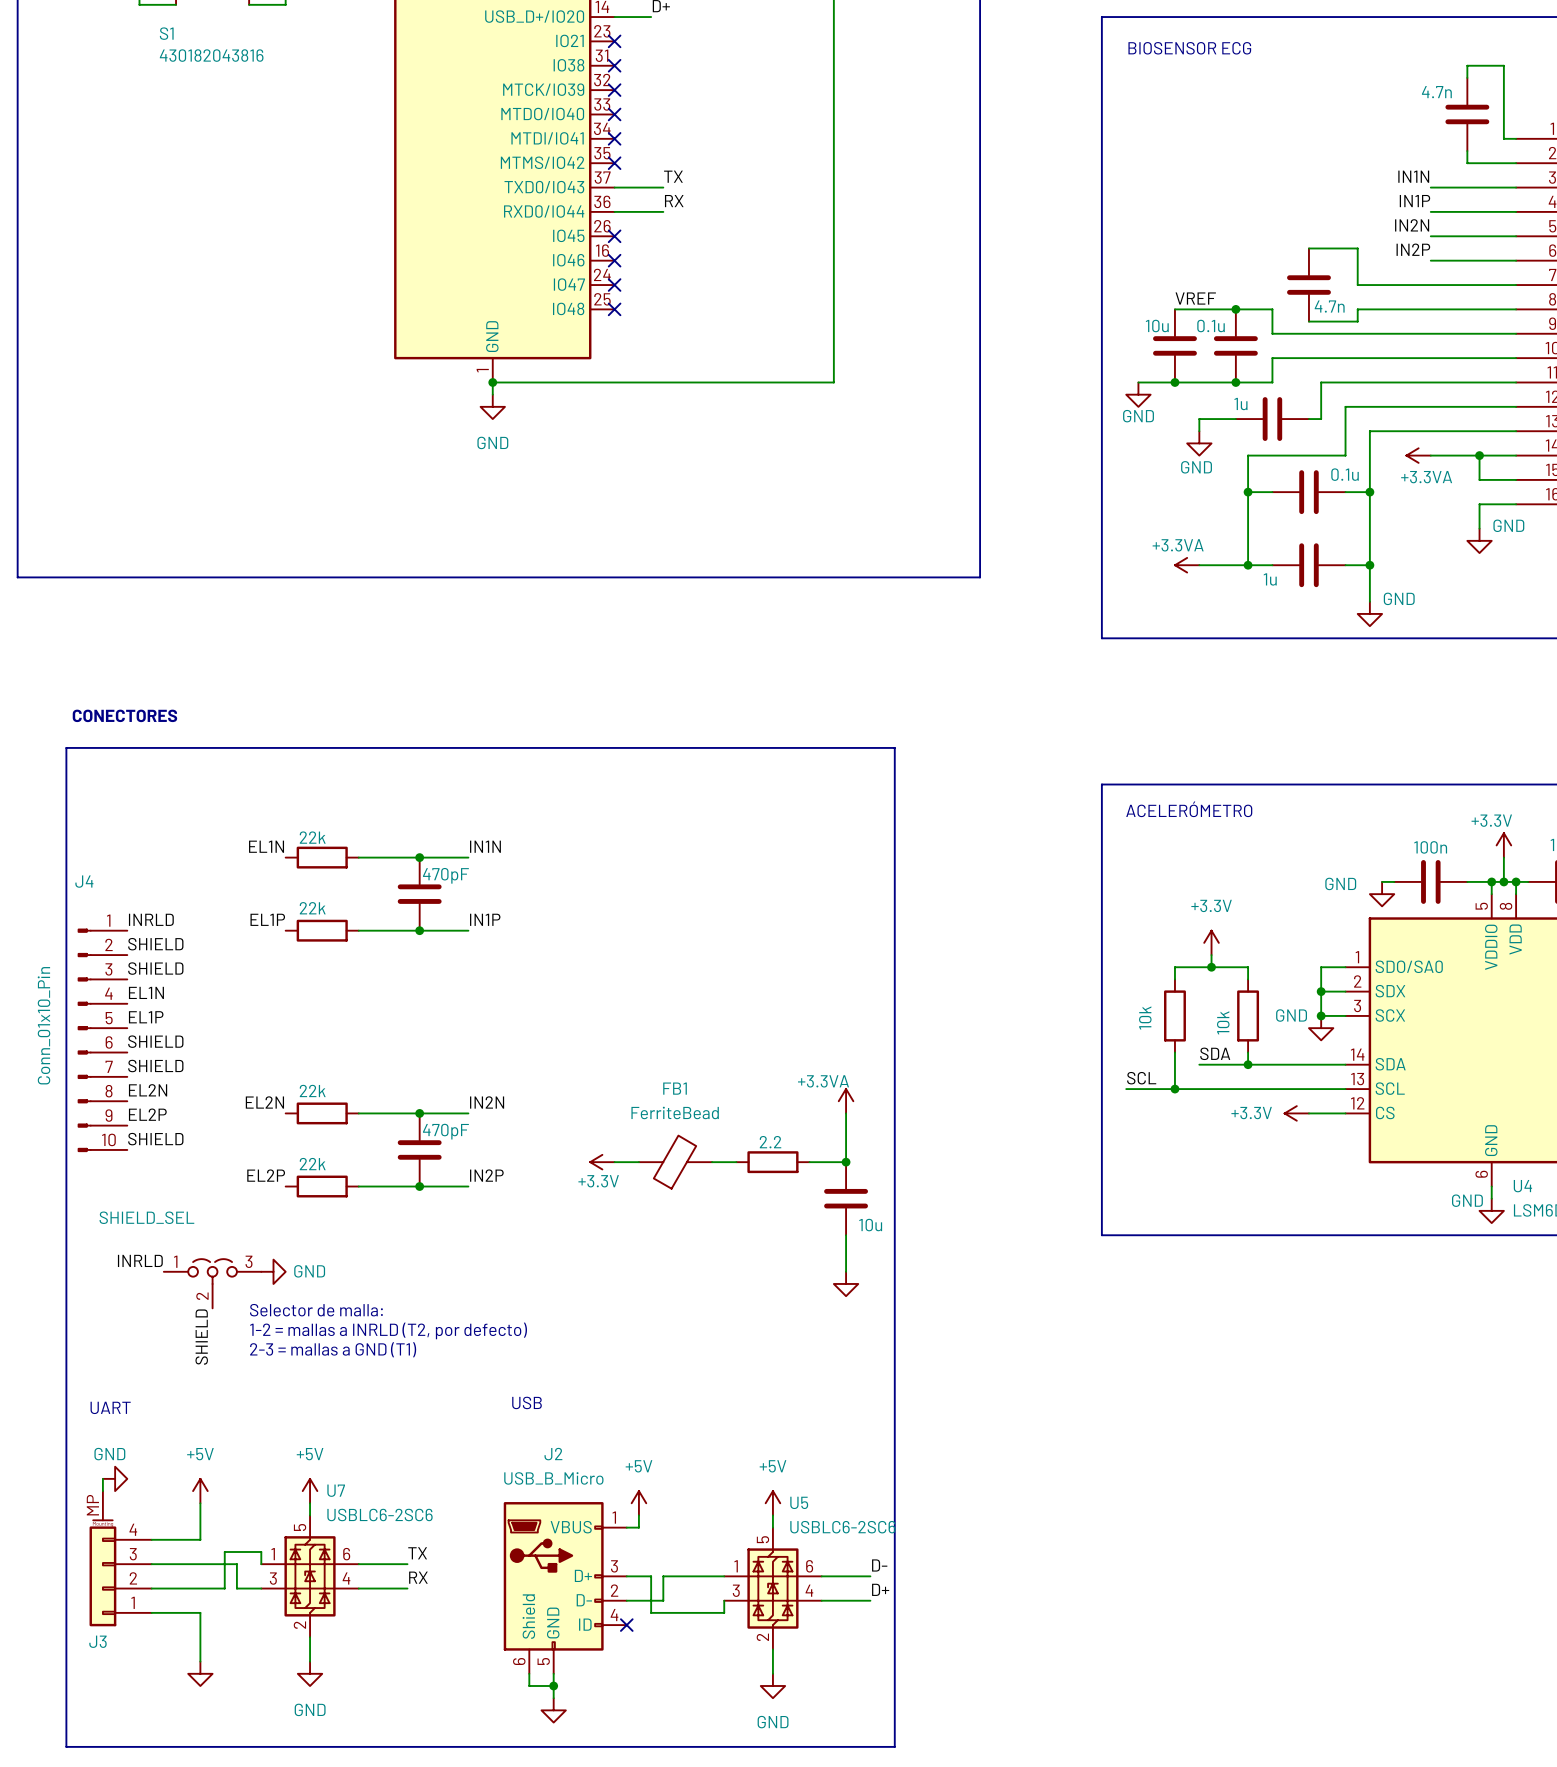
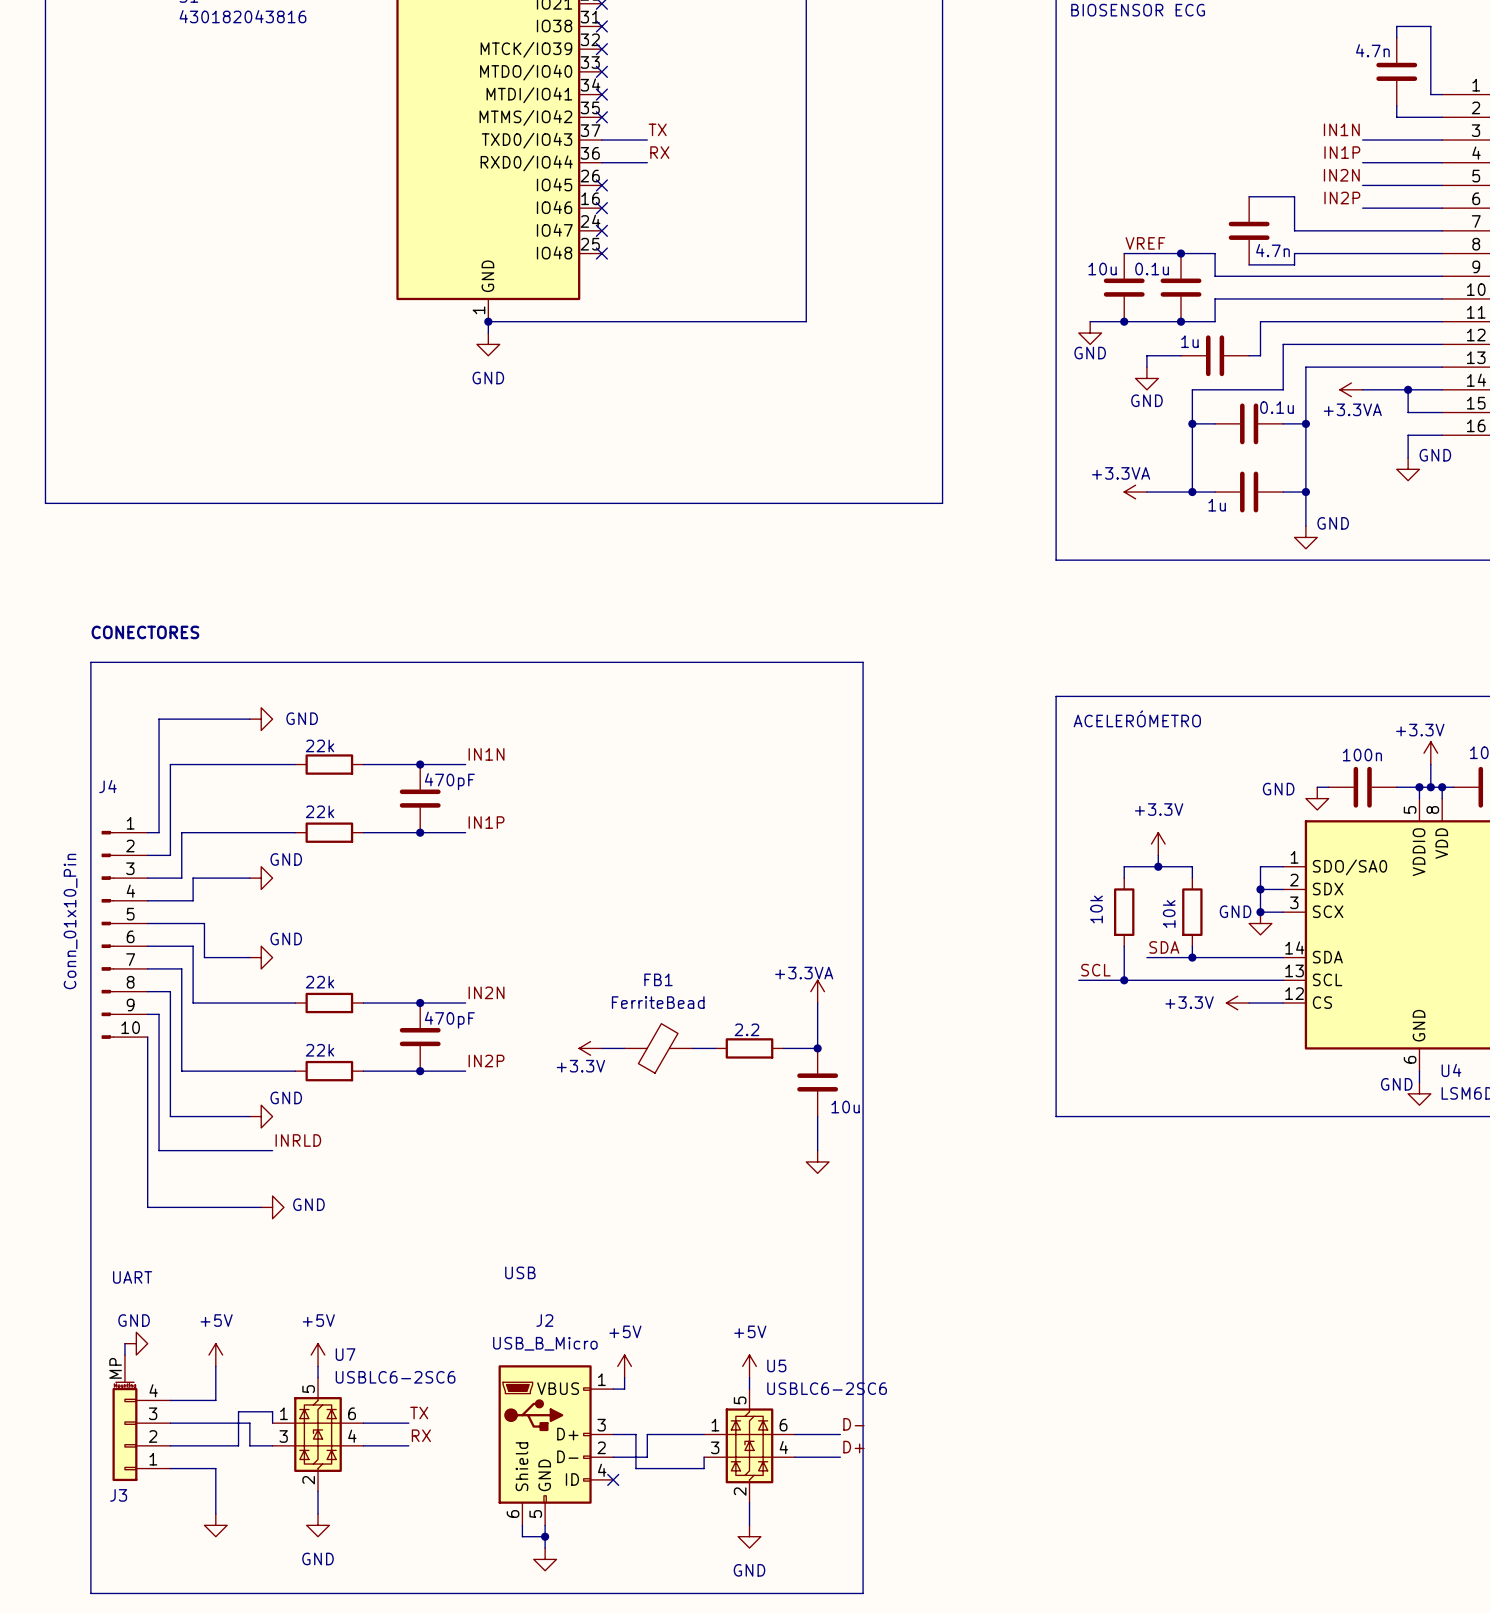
wire: none -> (249, 719) (159, 719) (159, 832) (147, 832)
power symbol: none -> GND (261, 719)
label: EL1N (266, 846) -> none
wire: none -> (295, 764) (170, 764) (170, 855) (147, 855)
label: INRLD (151, 919) -> none
label: EL1P (267, 919) -> none
wire: none -> (295, 832) (181, 832) (181, 878) (147, 878)
label: SHIELD (155, 944) -> none
label: SHIELD (155, 968) -> none
wire: none -> (249, 878) (193, 878) (193, 900) (147, 900)
power symbol: none -> GND (261, 878)
label: EL1N (146, 992) -> none
label: EL1P (146, 1017) -> none
wire: none -> (147, 923) (204, 923) (204, 957) (249, 957)
label: SHIELD (155, 1041) -> none
wire: none -> (147, 946) (193, 946) (193, 1003) (295, 1003)
power symbol: none -> GND (261, 957)
label: SHIELD (155, 1066) -> none
wire: none -> (147, 968) (181, 968) (181, 1071) (295, 1071)
label: EL2N (148, 1090) -> none
wire: none -> (147, 991) (170, 991) (170, 1116) (249, 1116)
label: EL2N (264, 1102) -> none
label: EL2P (147, 1114) -> none
wire: none -> (147, 1014) (159, 1014) (159, 1150) (272, 1150)
label: SHIELD (155, 1139) -> none
wire: none -> (147, 1037) (147, 1207) (261, 1207)
label: EL2P (266, 1175) -> none
power symbol: none -> GND (261, 1116)
label position: INRLD (140, 1260) -> INRLD (298, 1140)
power symbol: GND (273, 1271) -> none
part: SHIELD_SEL (212, 1283) -> none
text: Selector de malla: (316, 1310) -> none
text: 1-2 = mallas a INRLD (T2, por defecto) (388, 1330) -> none
power symbol: none -> GND (272, 1207)
label: SHIELD (201, 1337) -> none
text: 2-3 = mallas a GND (T1) (333, 1349) -> none

